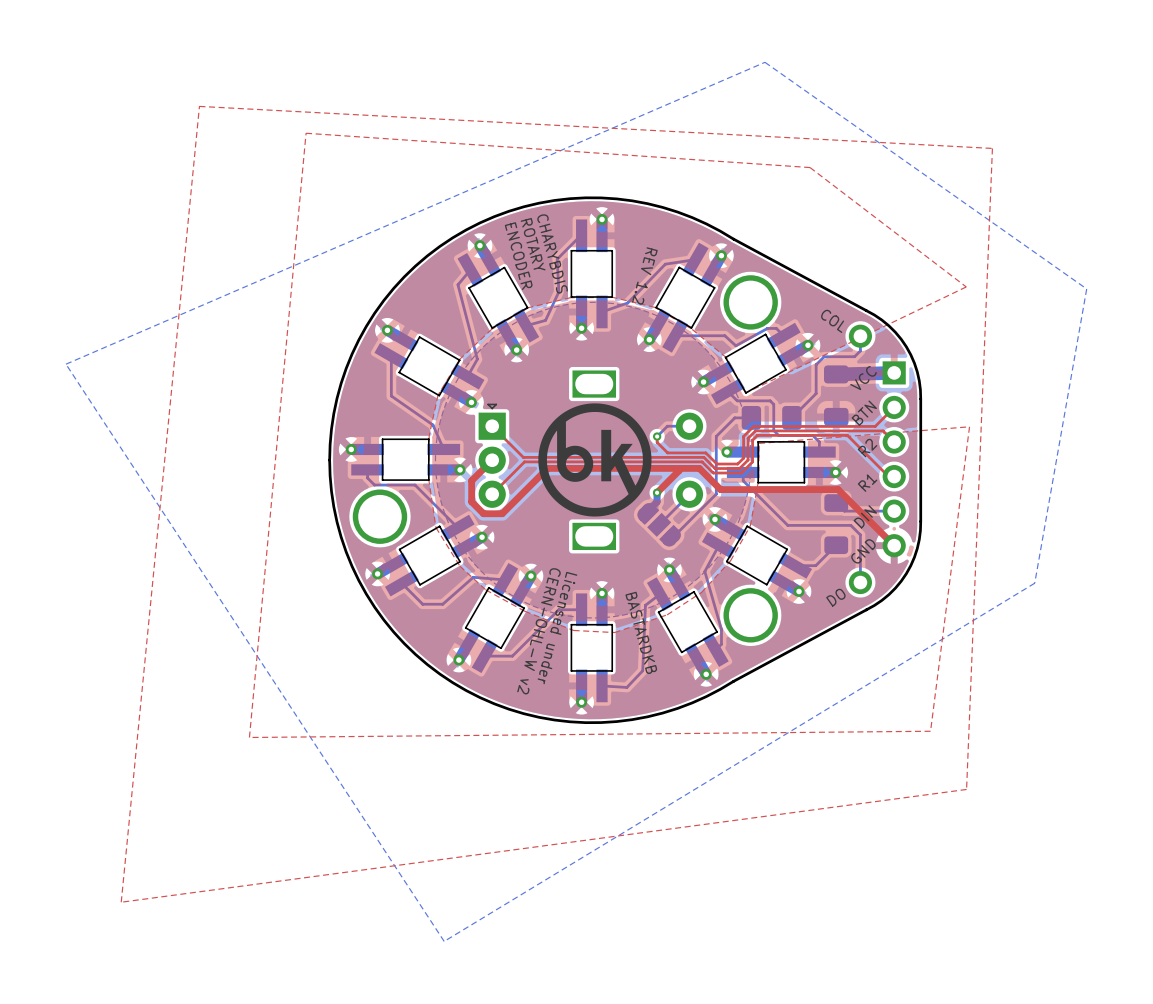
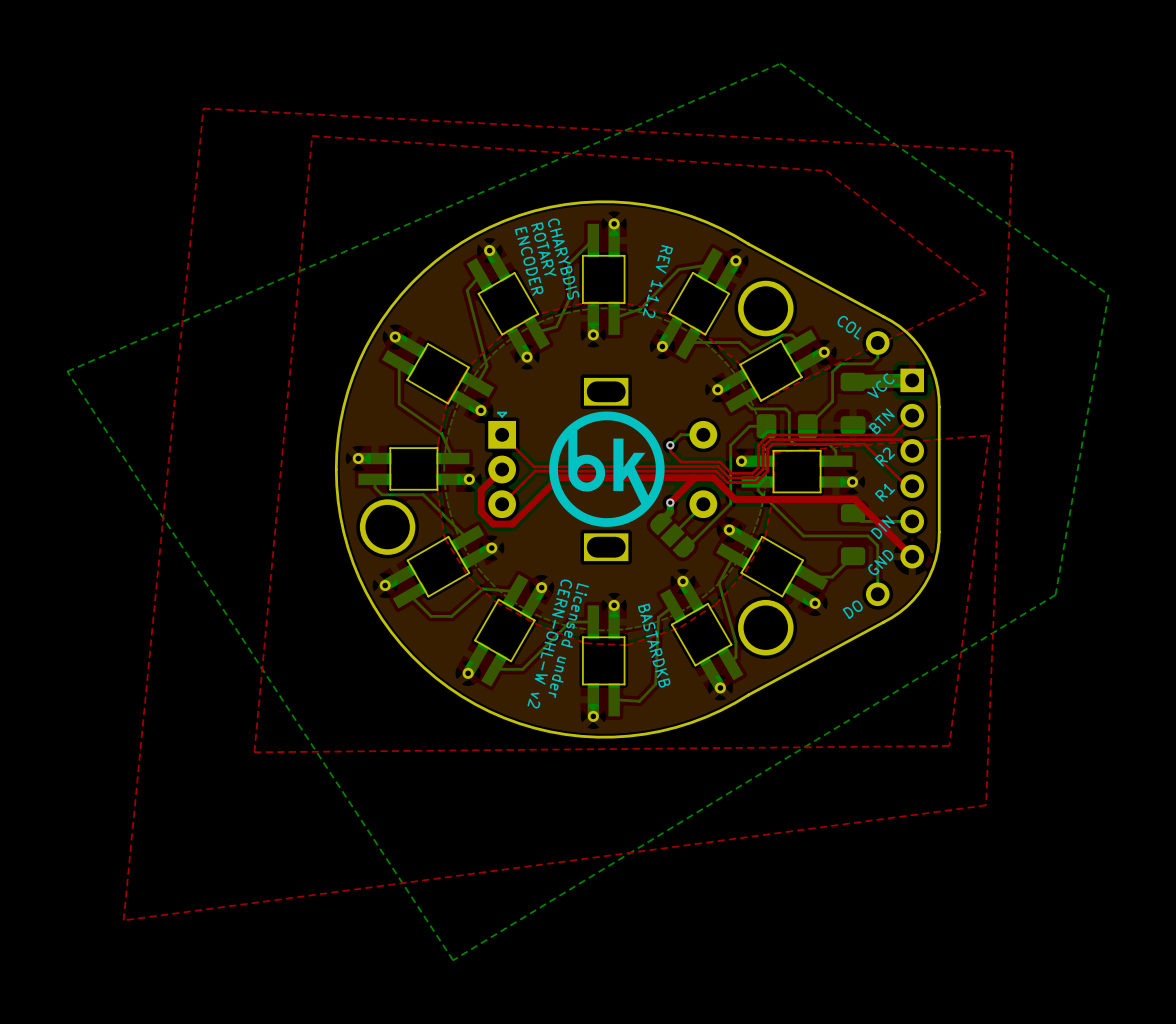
text: REV 1.2 (644, 275) -> REV 1.1.2 (657, 281)

